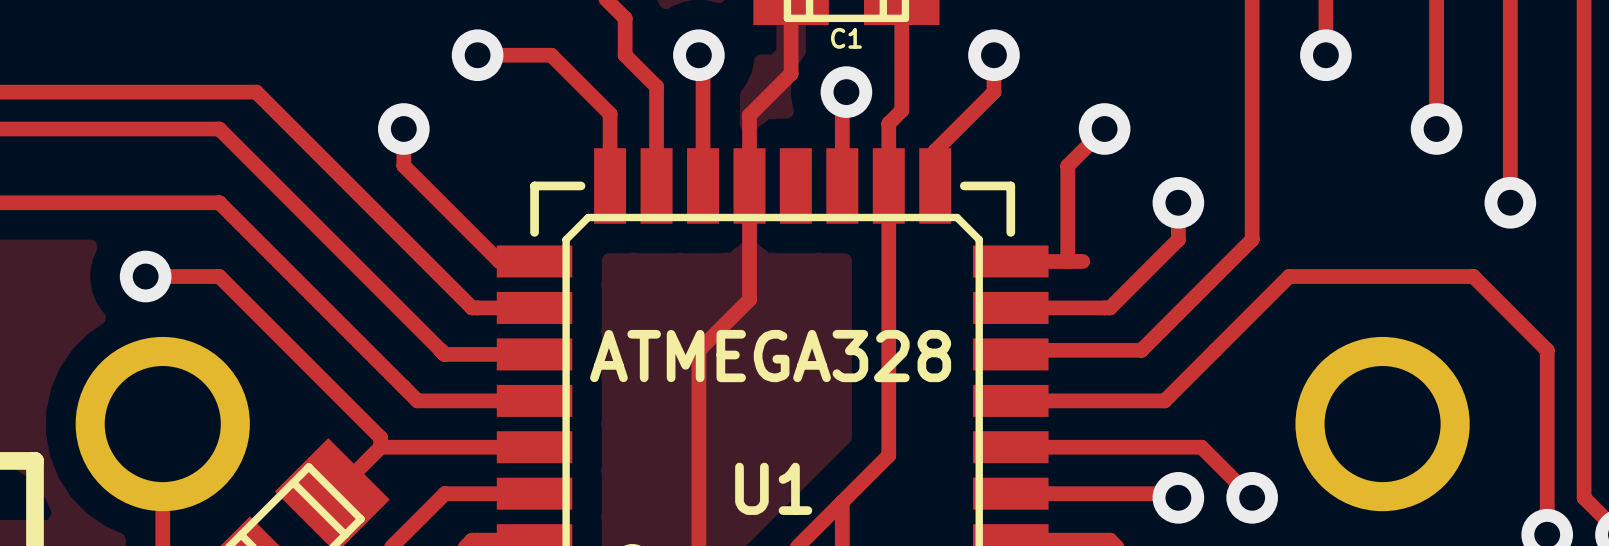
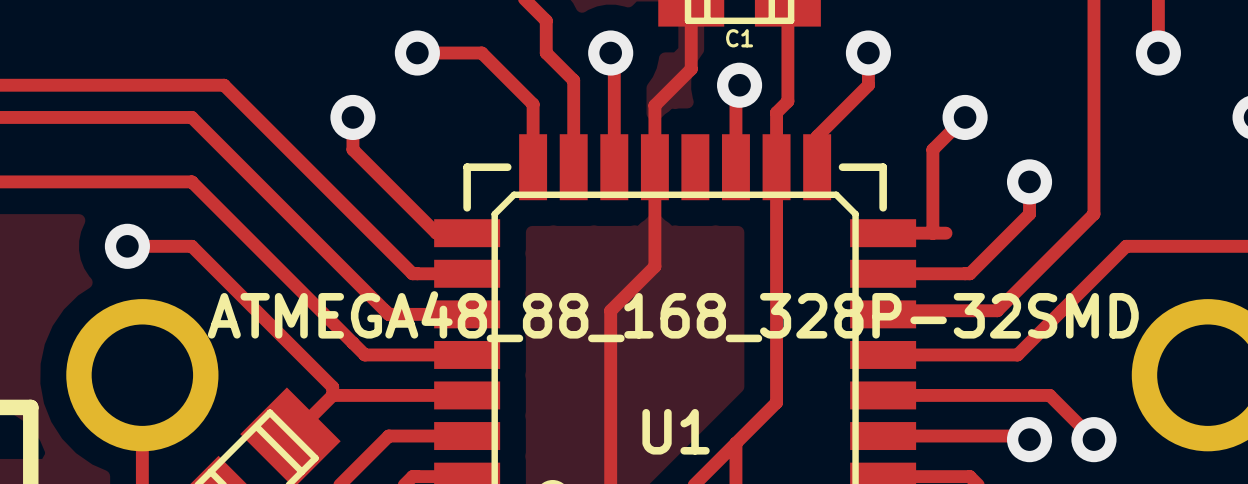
U1 value: ATMEGA328 (770, 356) -> ATMEGA48_88_168_328P-32SMD (673, 316)

